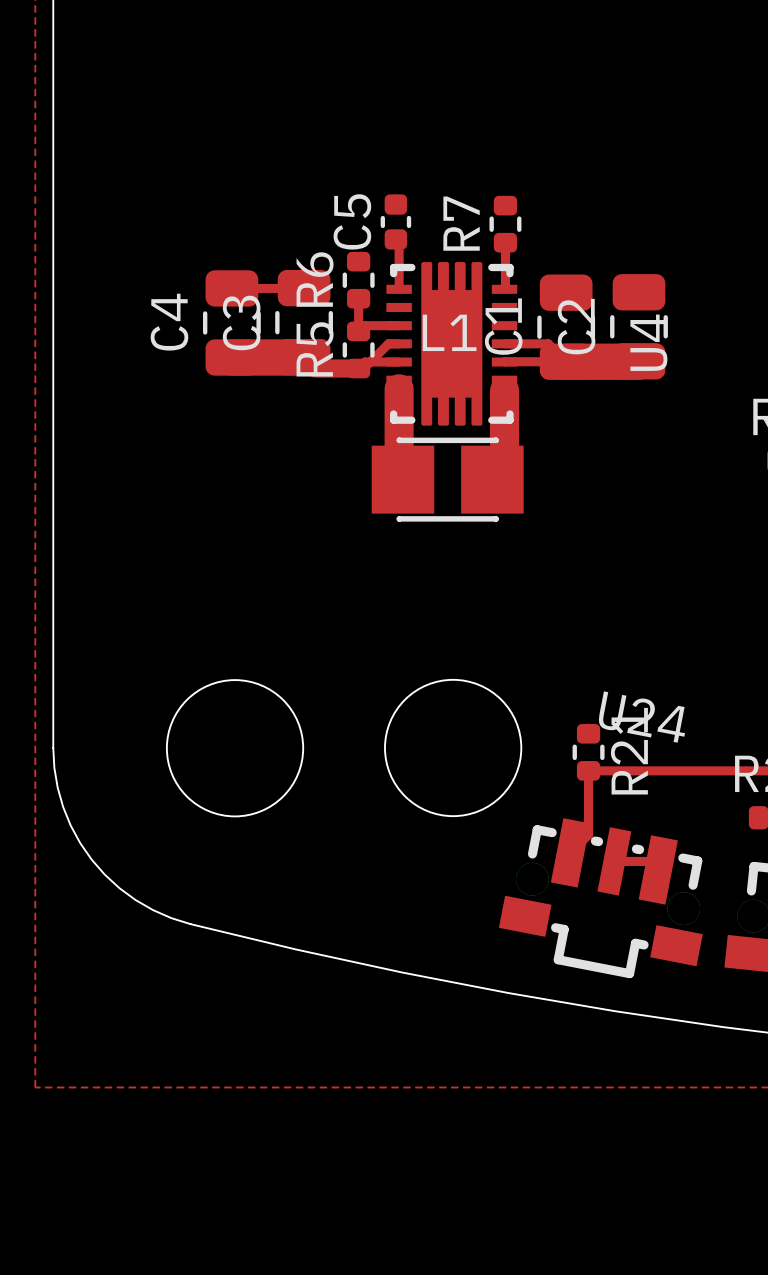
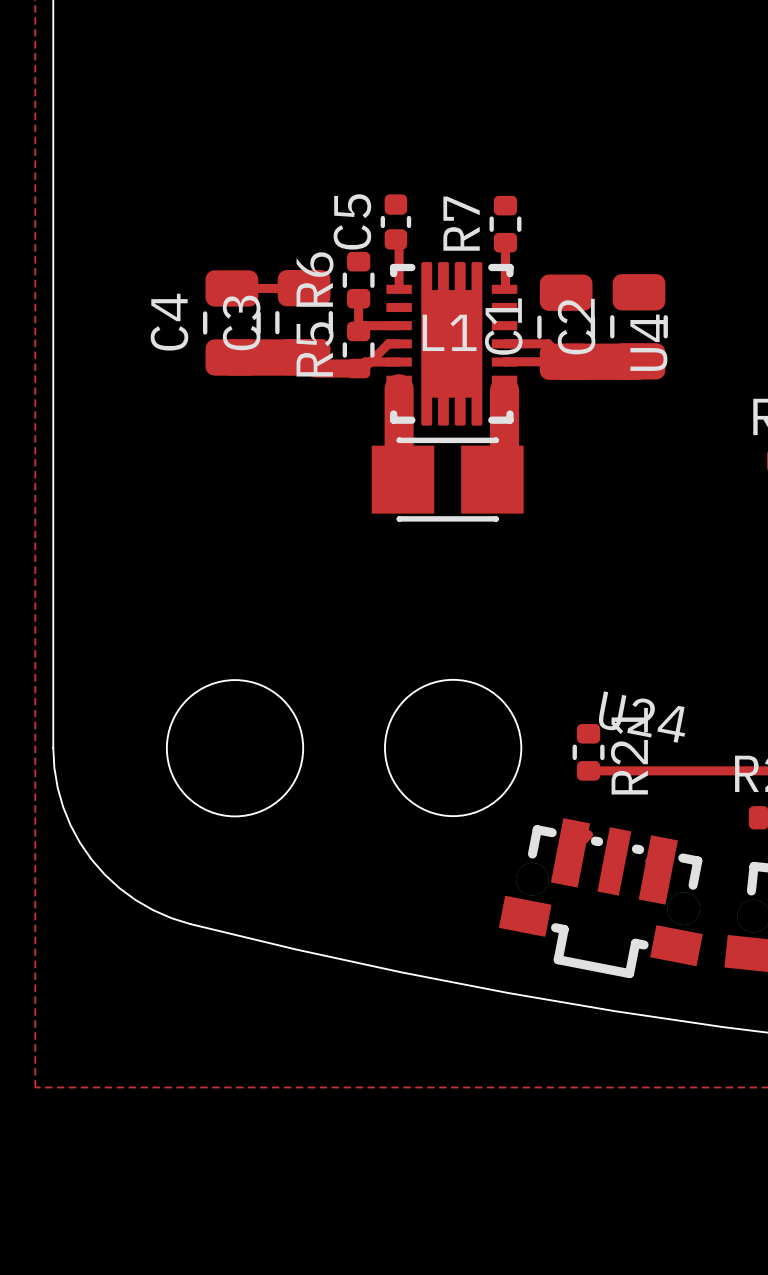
track: (588, 770) (588, 834) -> none
track: (614, 861) (649, 861) -> none

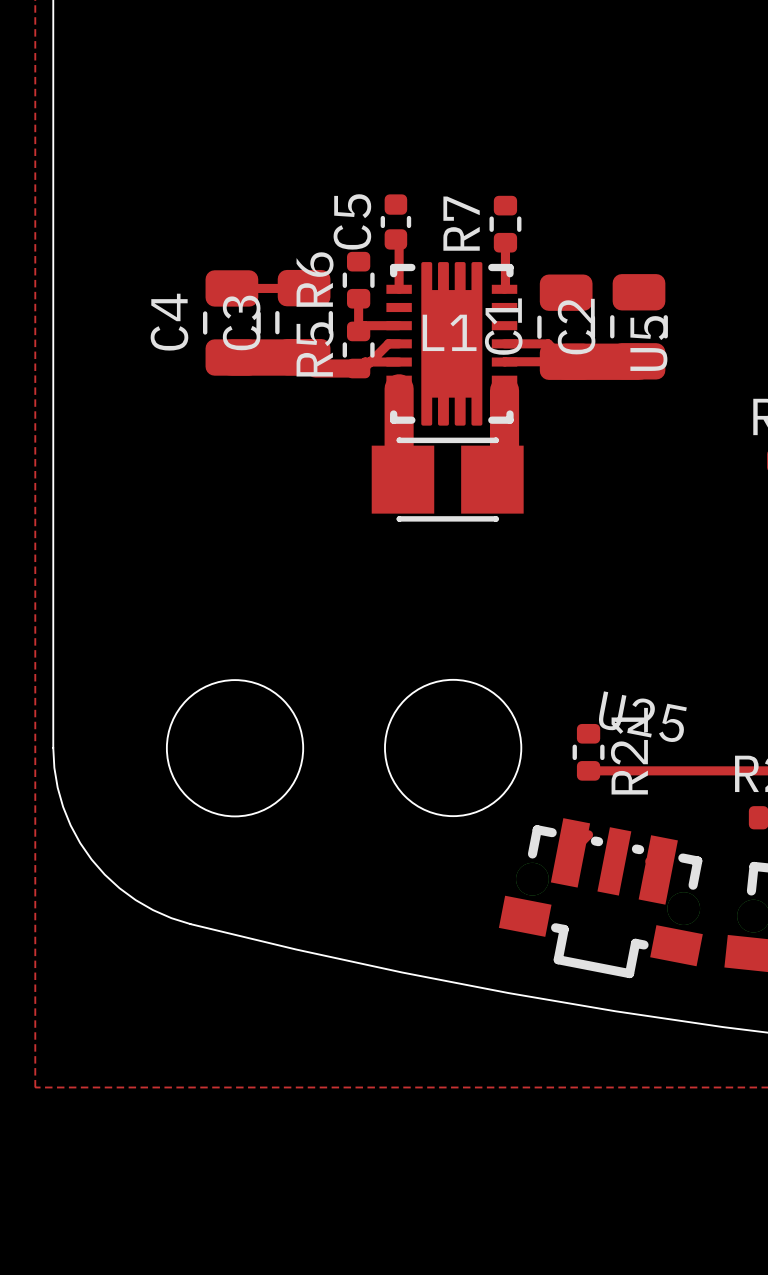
U4 name: U4 (648, 342) -> U5 (648, 343)
U24 name: U24 (641, 717) -> U25 (642, 716)

